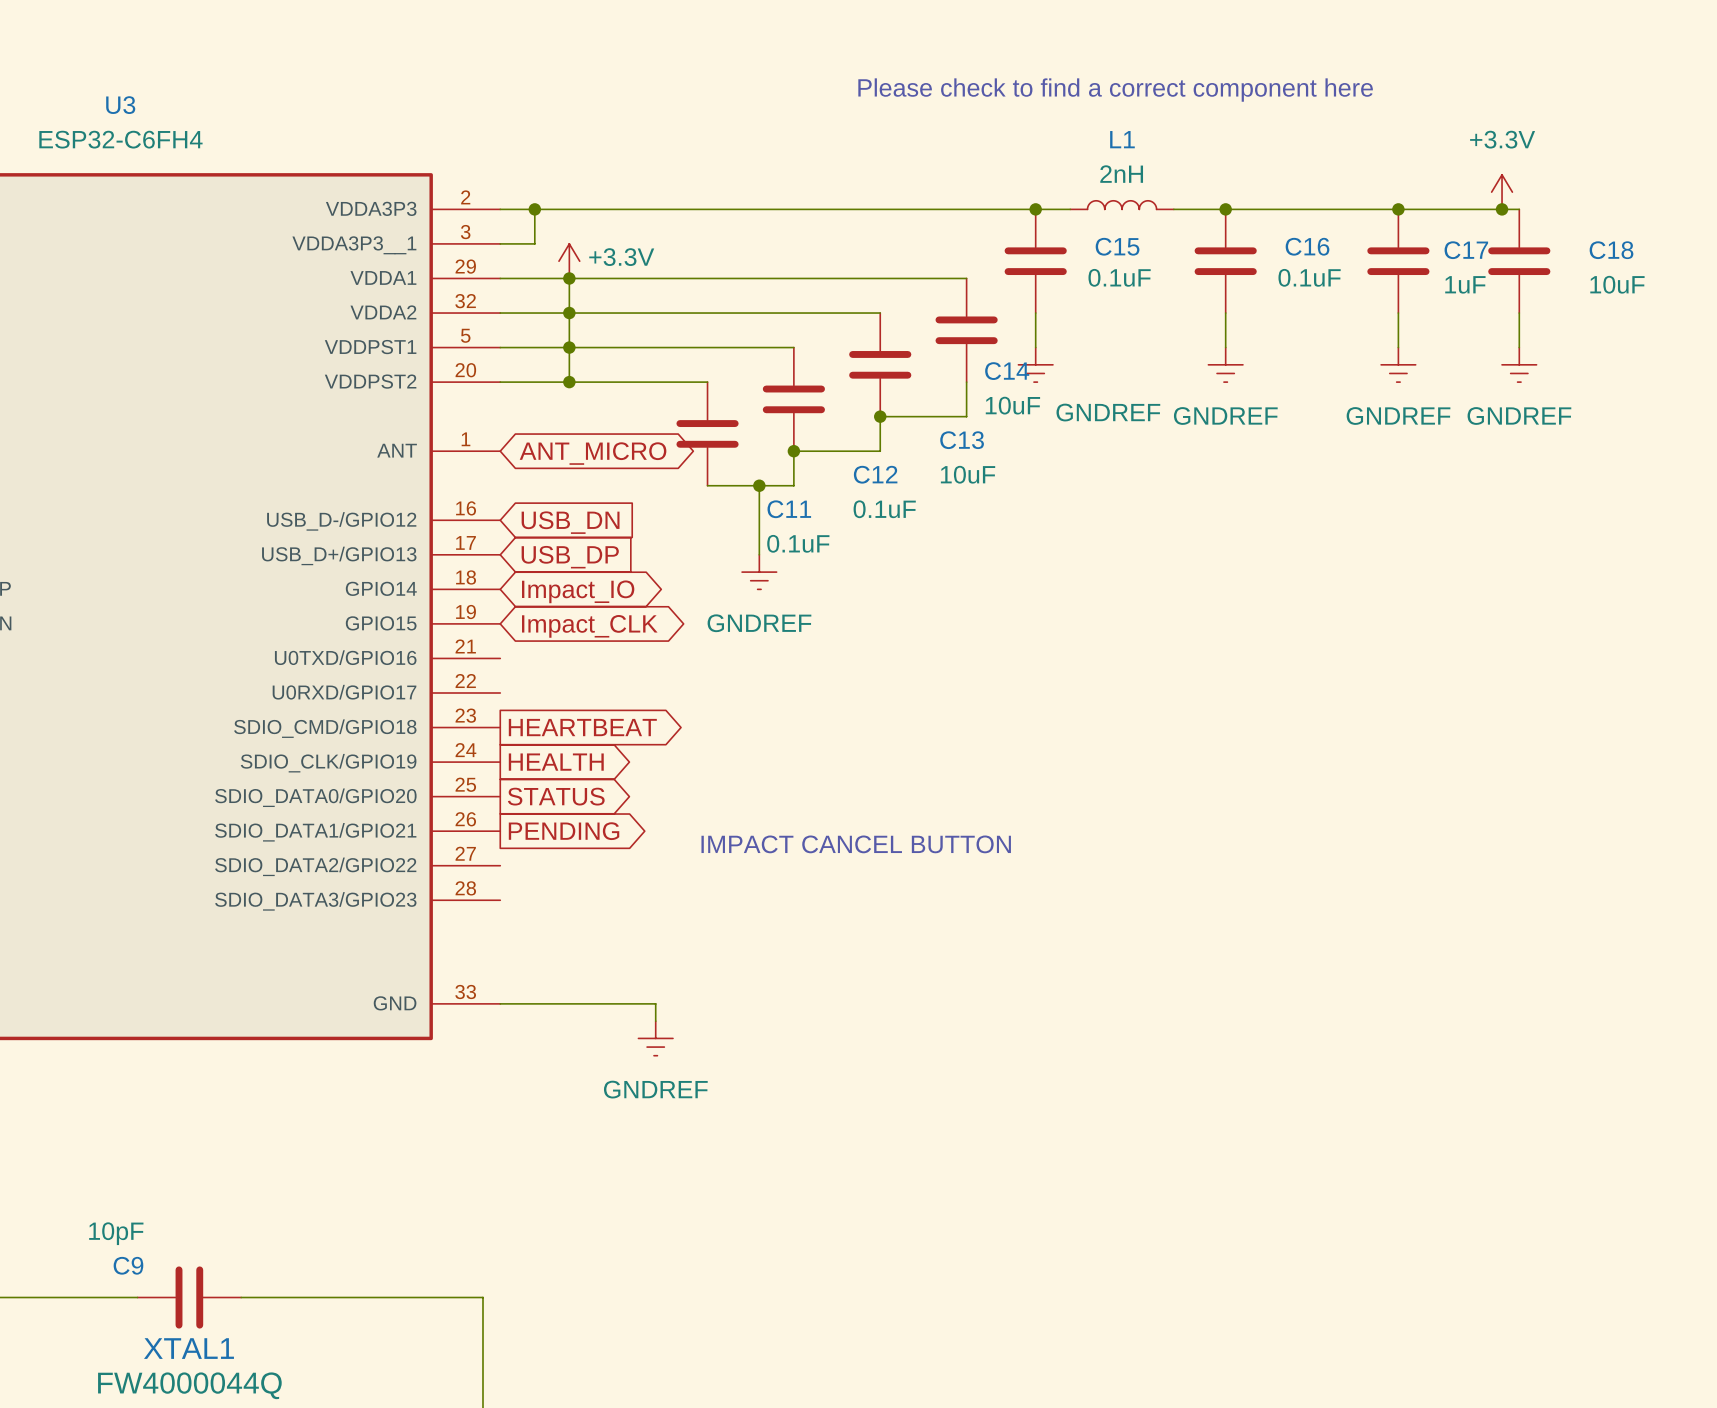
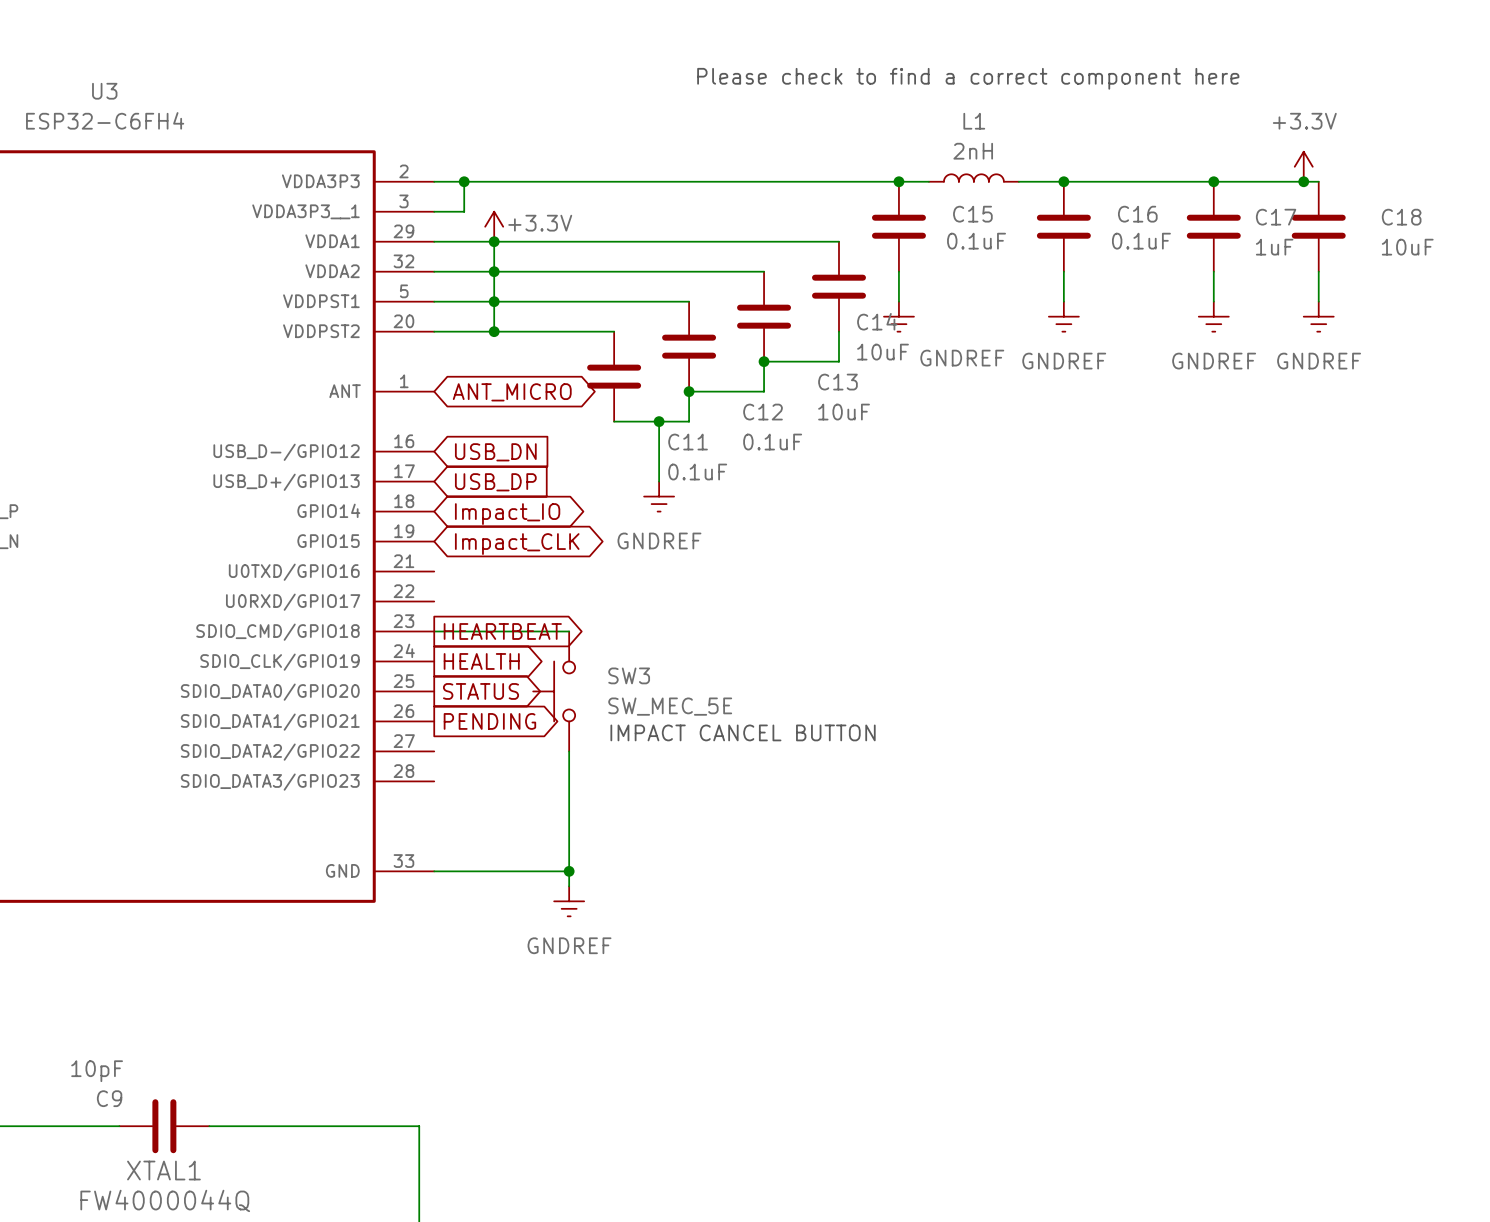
wire: none -> (434, 631) (569, 631)
SW3: none -> SW_MEC_5E (554, 691)
wire: none -> (569, 751) (569, 871)
junction: none -> (569, 871)

